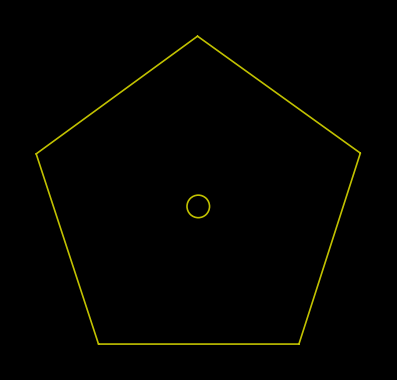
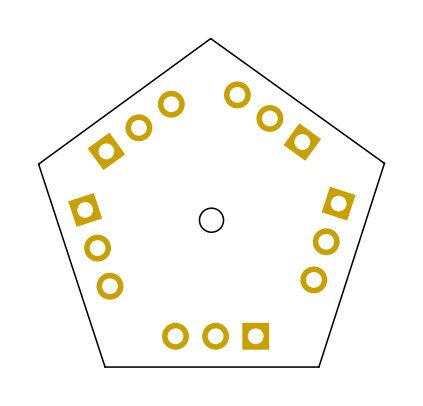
part: none -> (272, 121)
part: none -> (136, 130)
part: none -> (327, 240)
part: none -> (95, 246)
part: none -> (215, 336)

